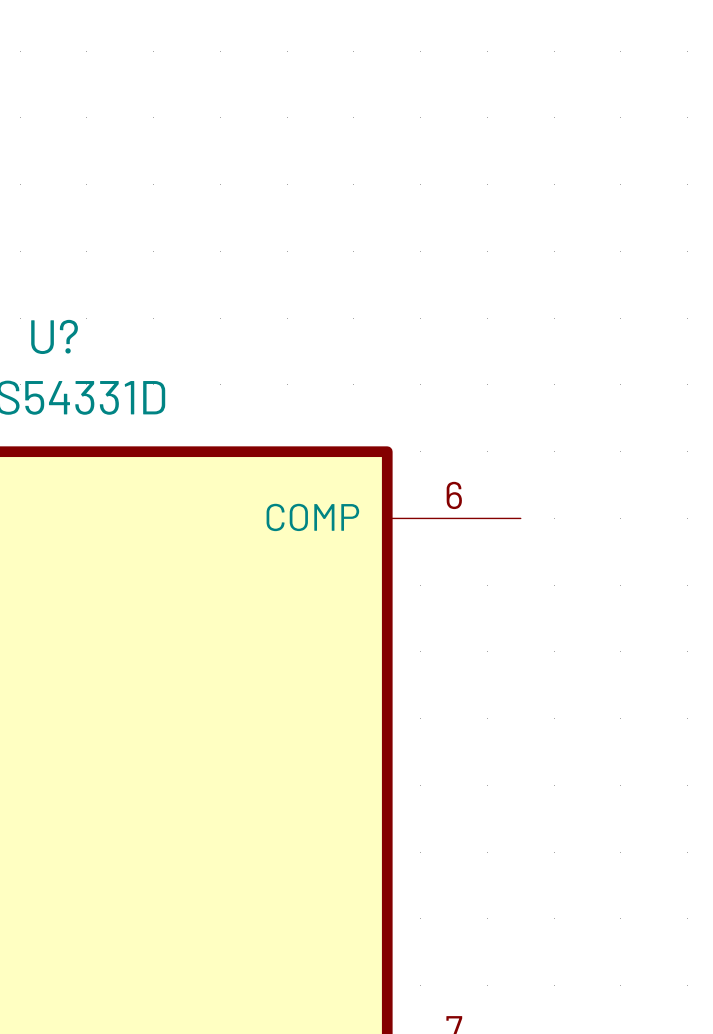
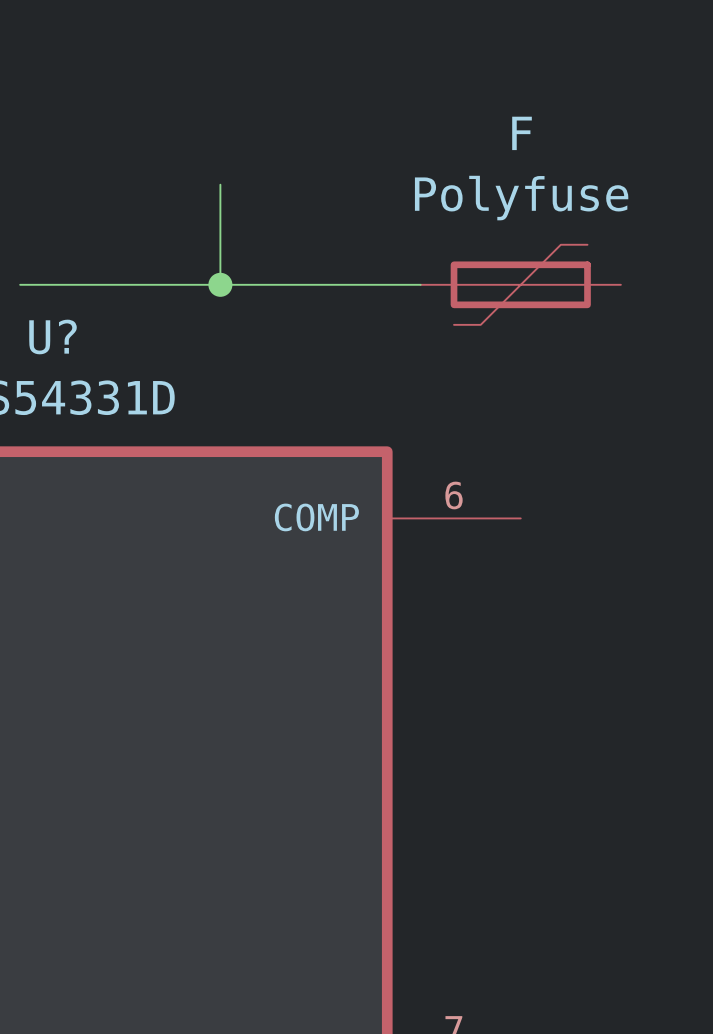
wire: none -> (220, 184) (220, 284)
wire: none -> (20, 284) (420, 284)
junction: none -> (220, 284)
F: none -> Polyfuse (520, 284)

